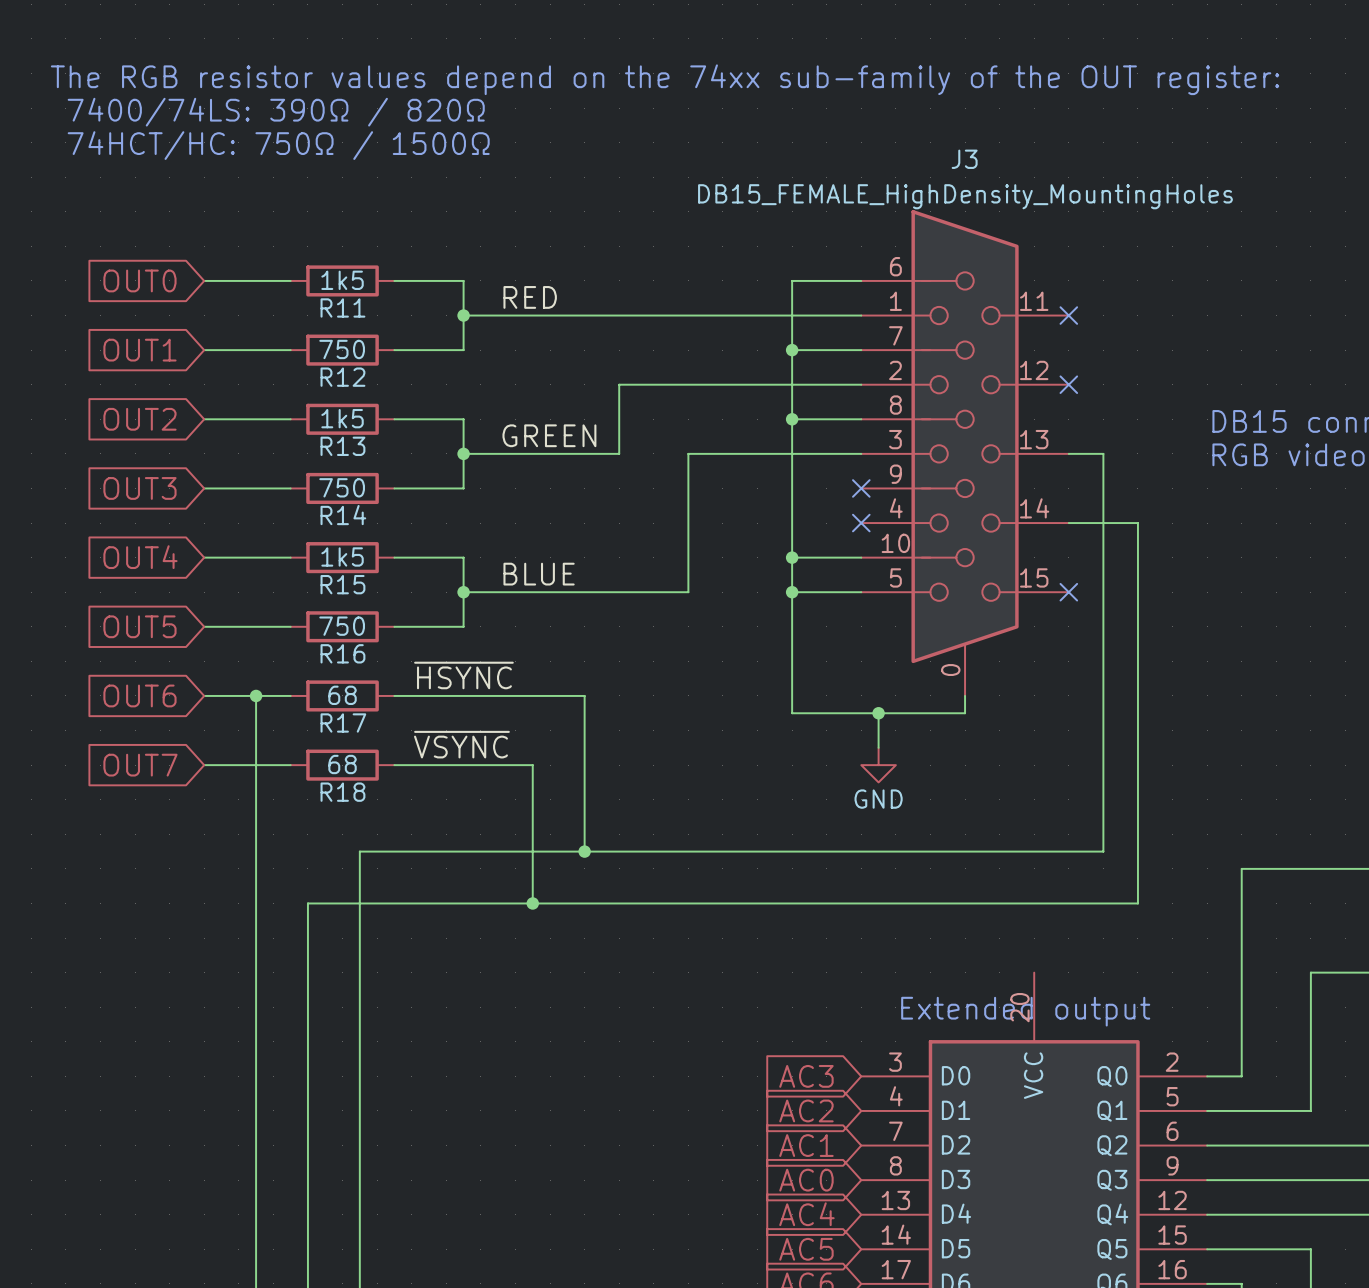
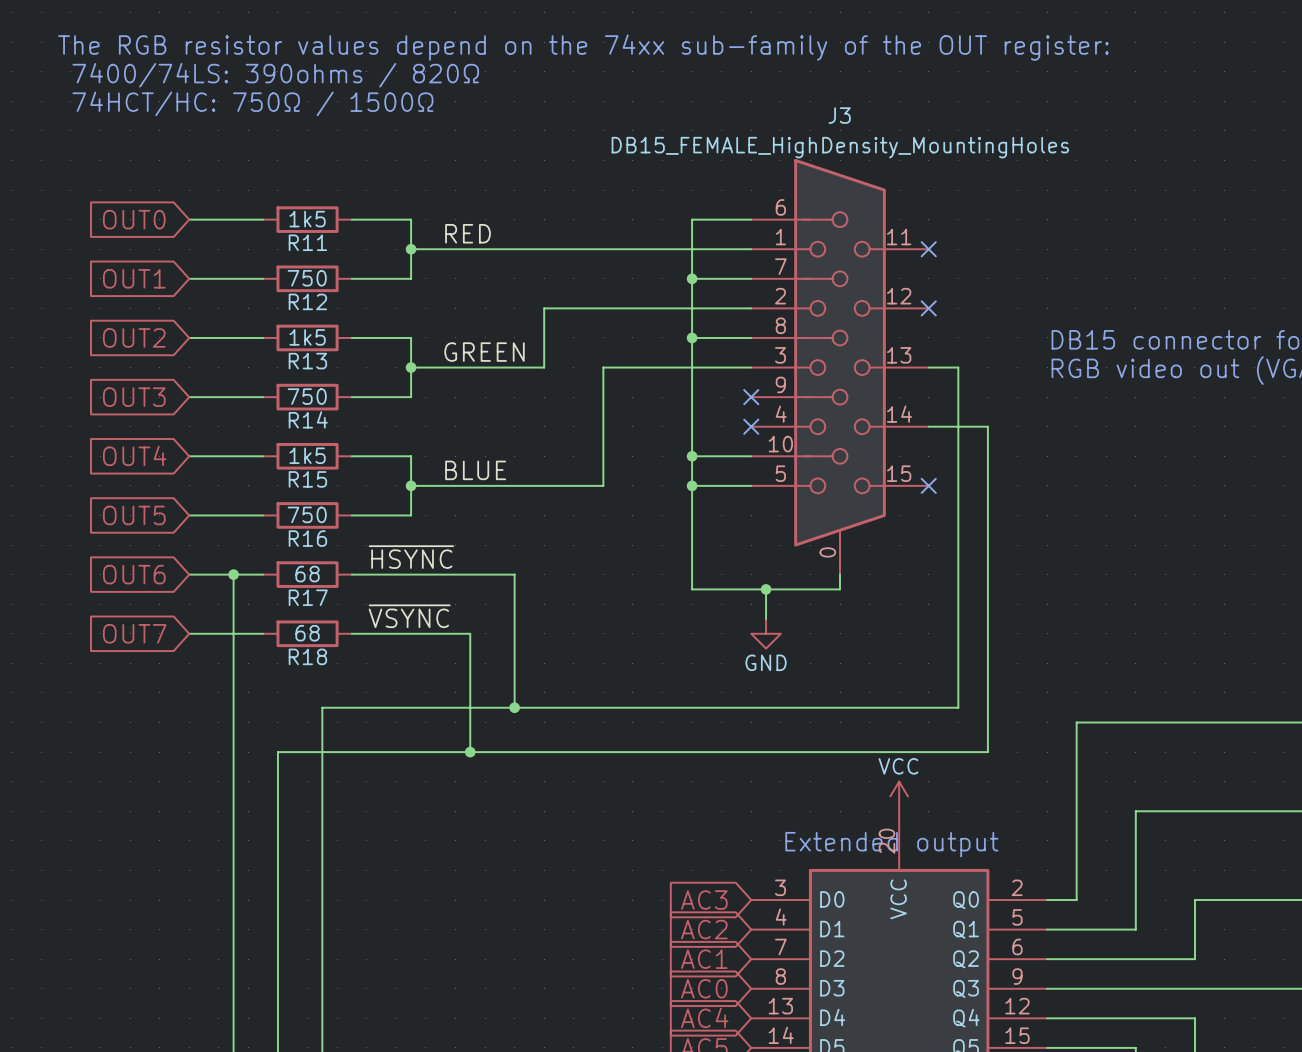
text: 7400/74LS: 390Ω / 820Ω (276, 112) -> 7400/74LS: 390ohms / 820Ω (275, 75)
power symbol: none -> VCC (899, 796)

